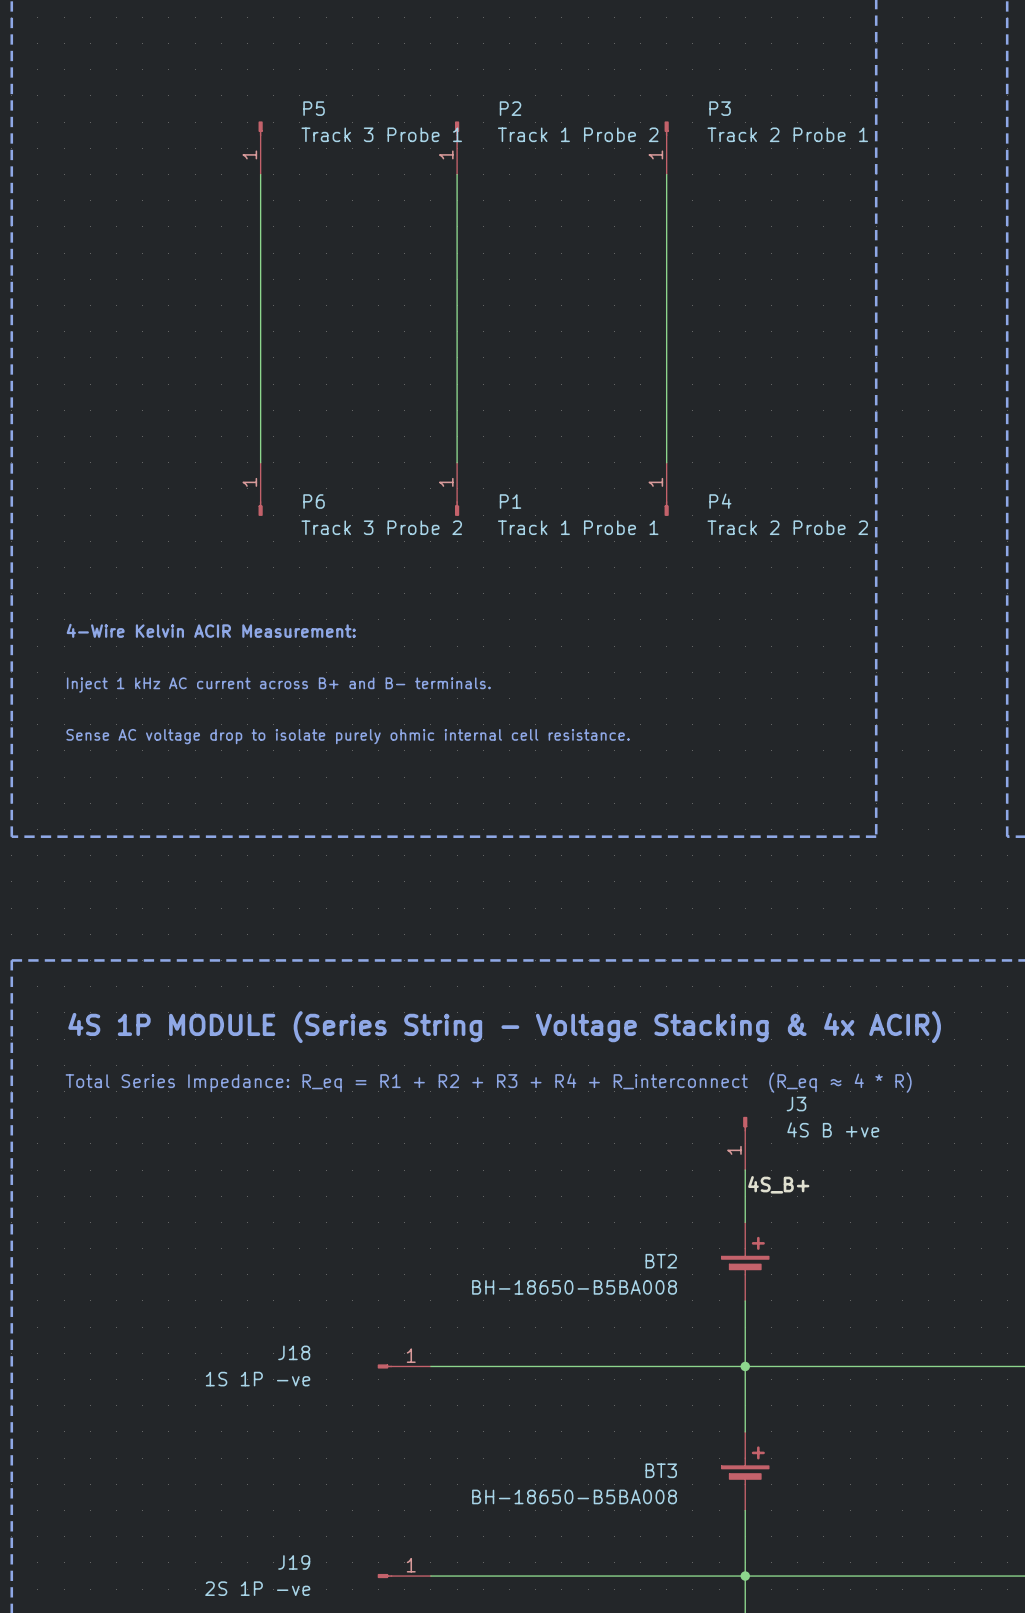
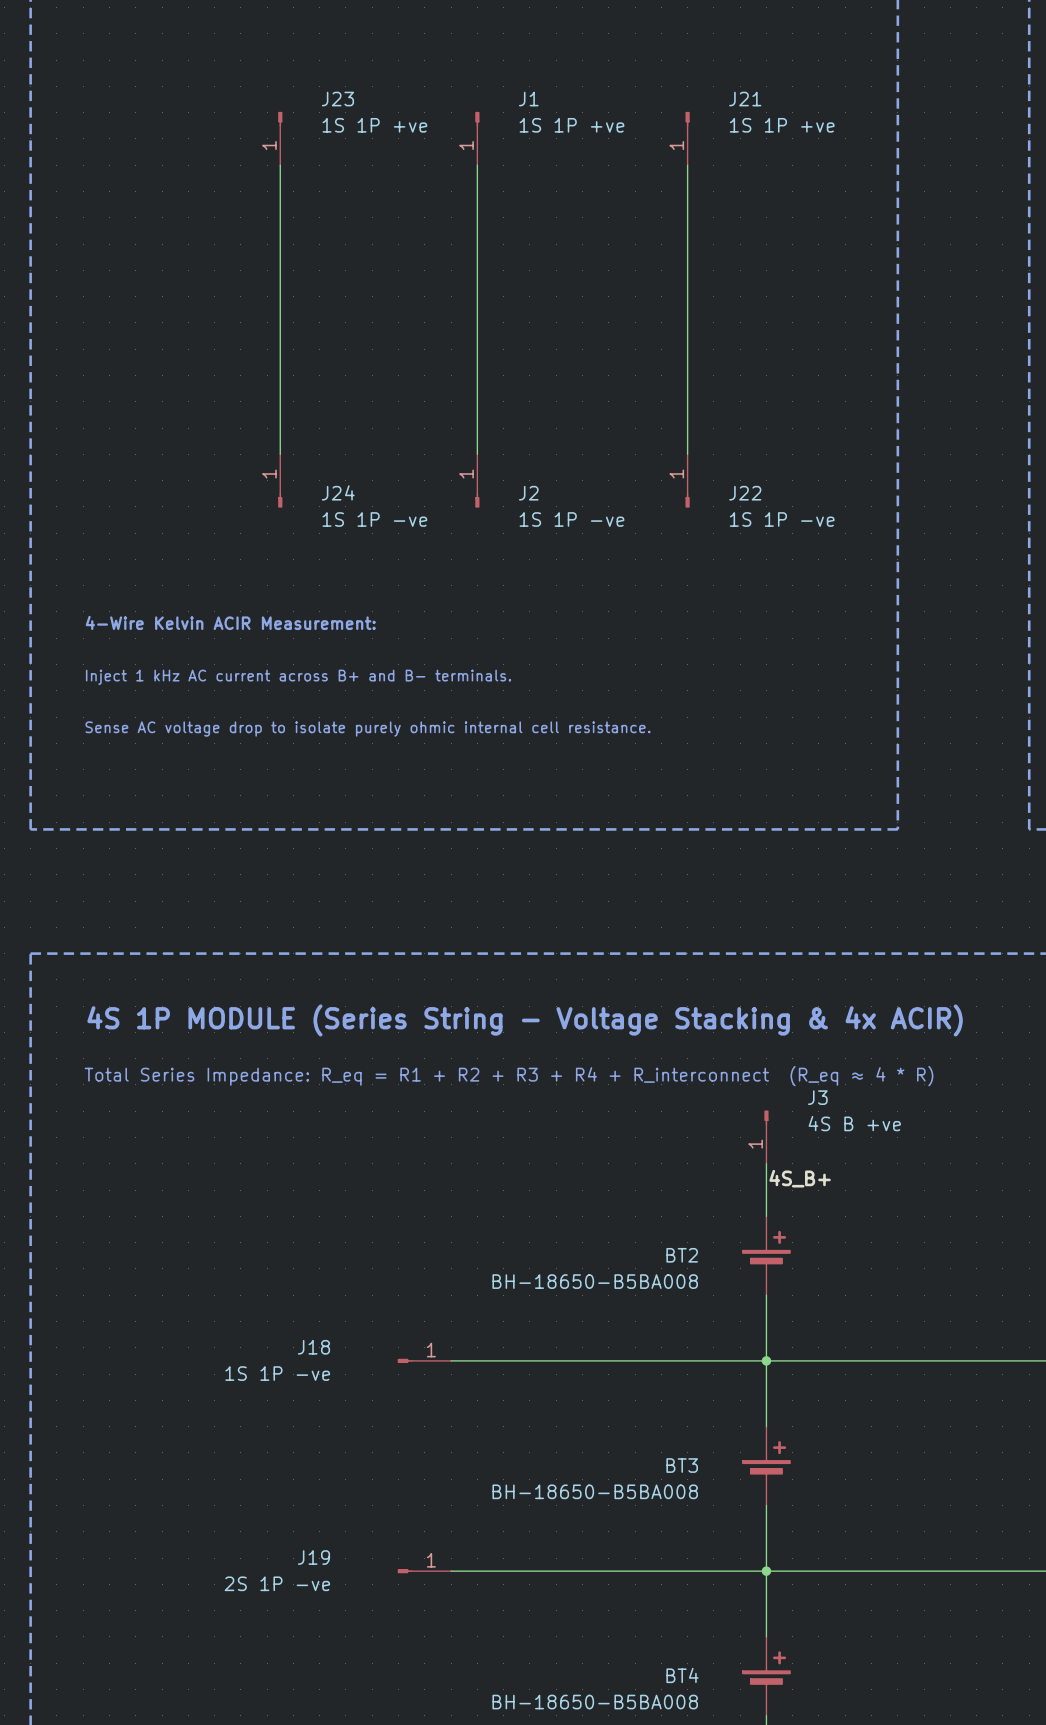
P5 name: P5 (314, 108) -> J23 (337, 99)
P2 name: P2 (510, 108) -> J1 (528, 99)
P3 name: P3 (720, 108) -> J21 (745, 99)
P5 value: Track 3 Probe 1 (381, 134) -> 1S 1P +ve (374, 125)
P2 value: Track 1 Probe 2 (578, 134) -> 1S 1P +ve (571, 125)
P3 value: Track 2 Probe 1 (787, 134) -> 1S 1P +ve (782, 125)
P6 name: P6 (314, 501) -> J24 (338, 492)
P1 name: P1 (510, 501) -> J2 (528, 493)
P4 name: P4 (720, 501) -> J22 (745, 493)
P6 value: Track 3 Probe 2 (381, 527) -> 1S 1P -ve (374, 519)
P1 value: Track 1 Probe 1 (578, 527) -> 1S 1P -ve (571, 519)
P4 value: Track 2 Probe 2 (787, 527) -> 1S 1P -ve (782, 519)

